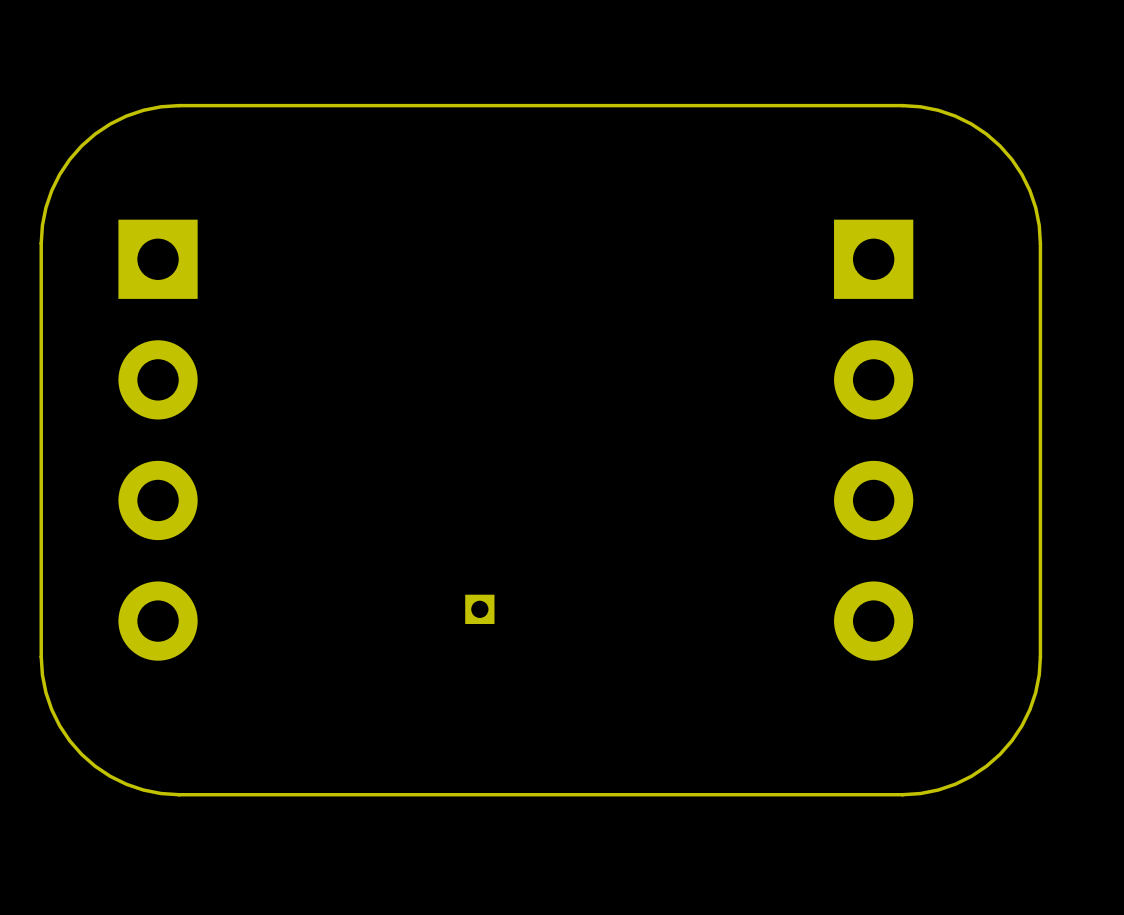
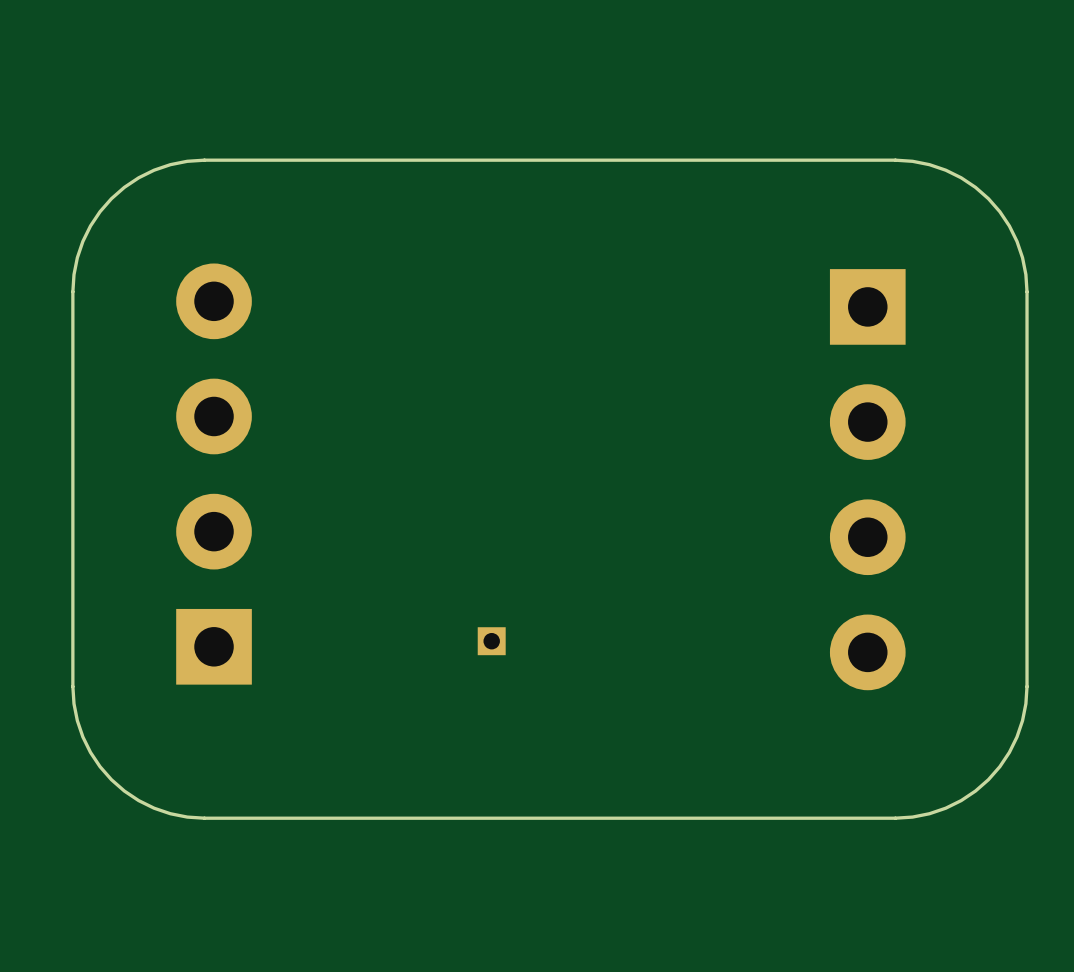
part rotation: 0° (158, 440) -> 180° (214, 474)

